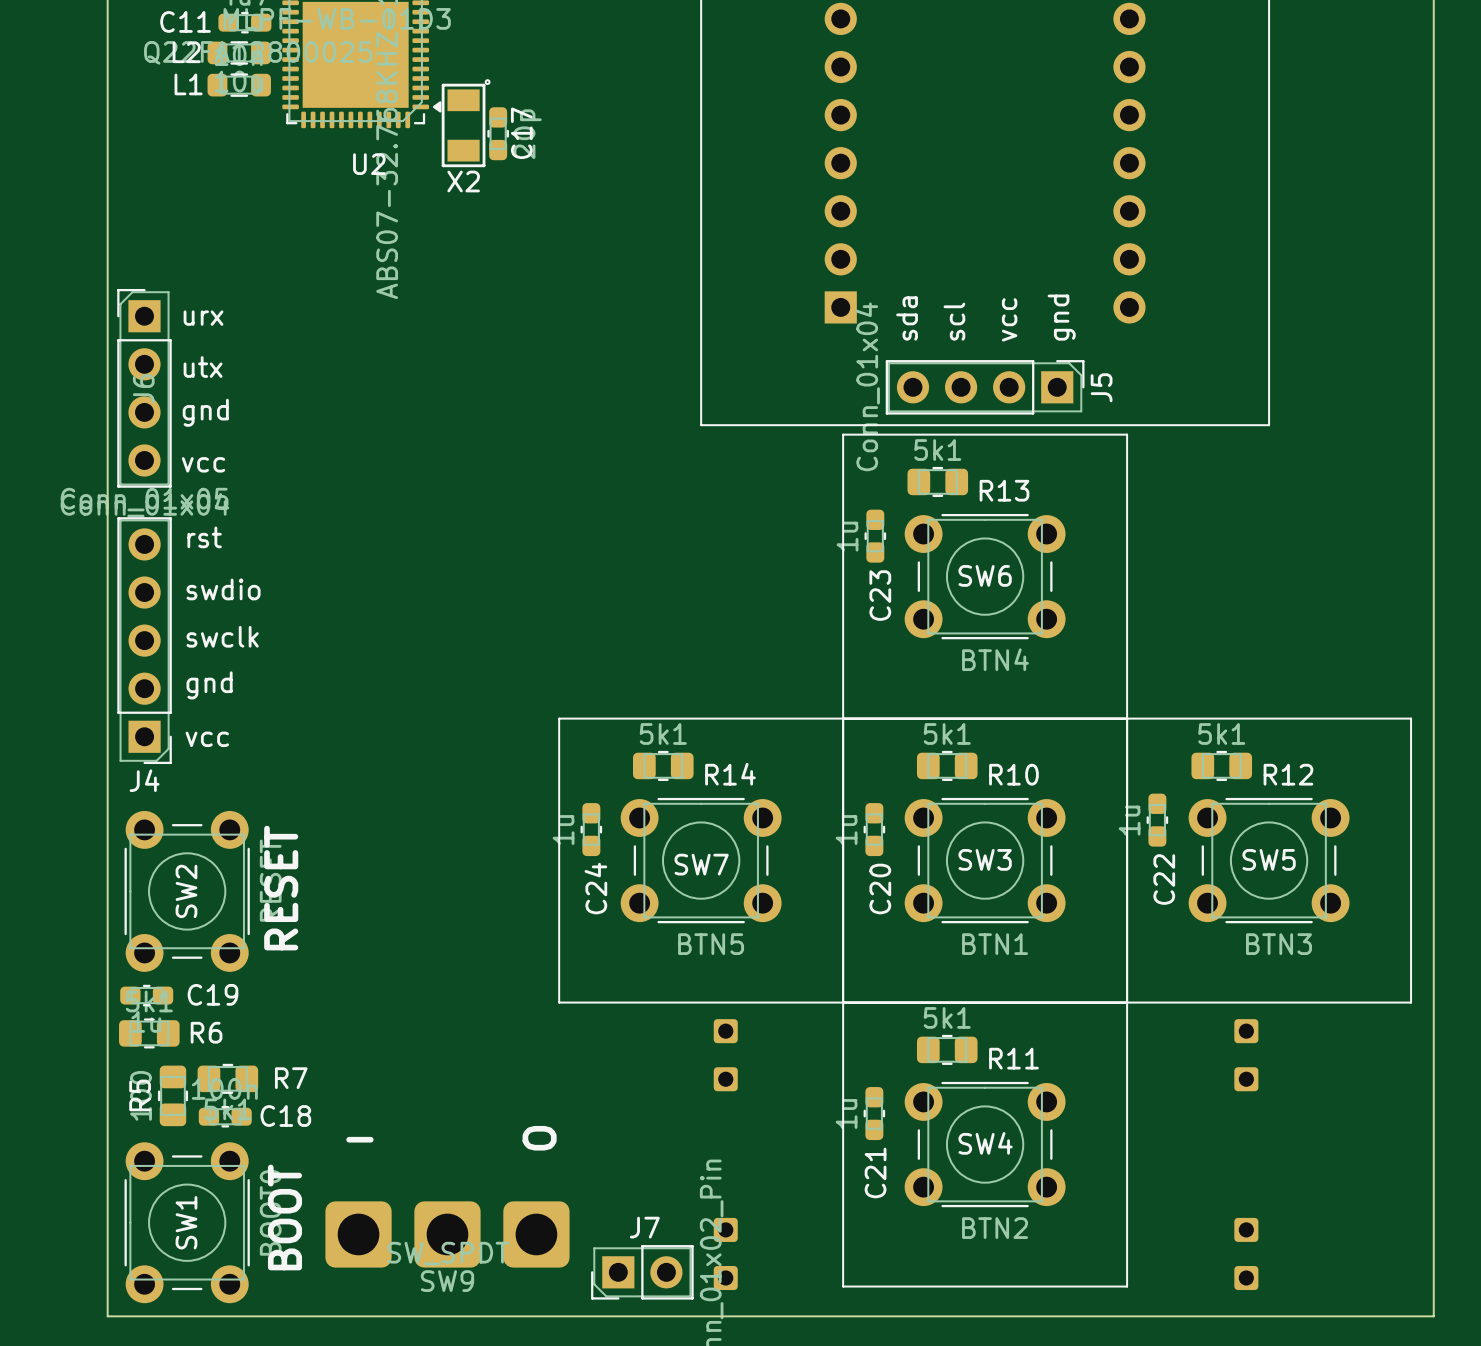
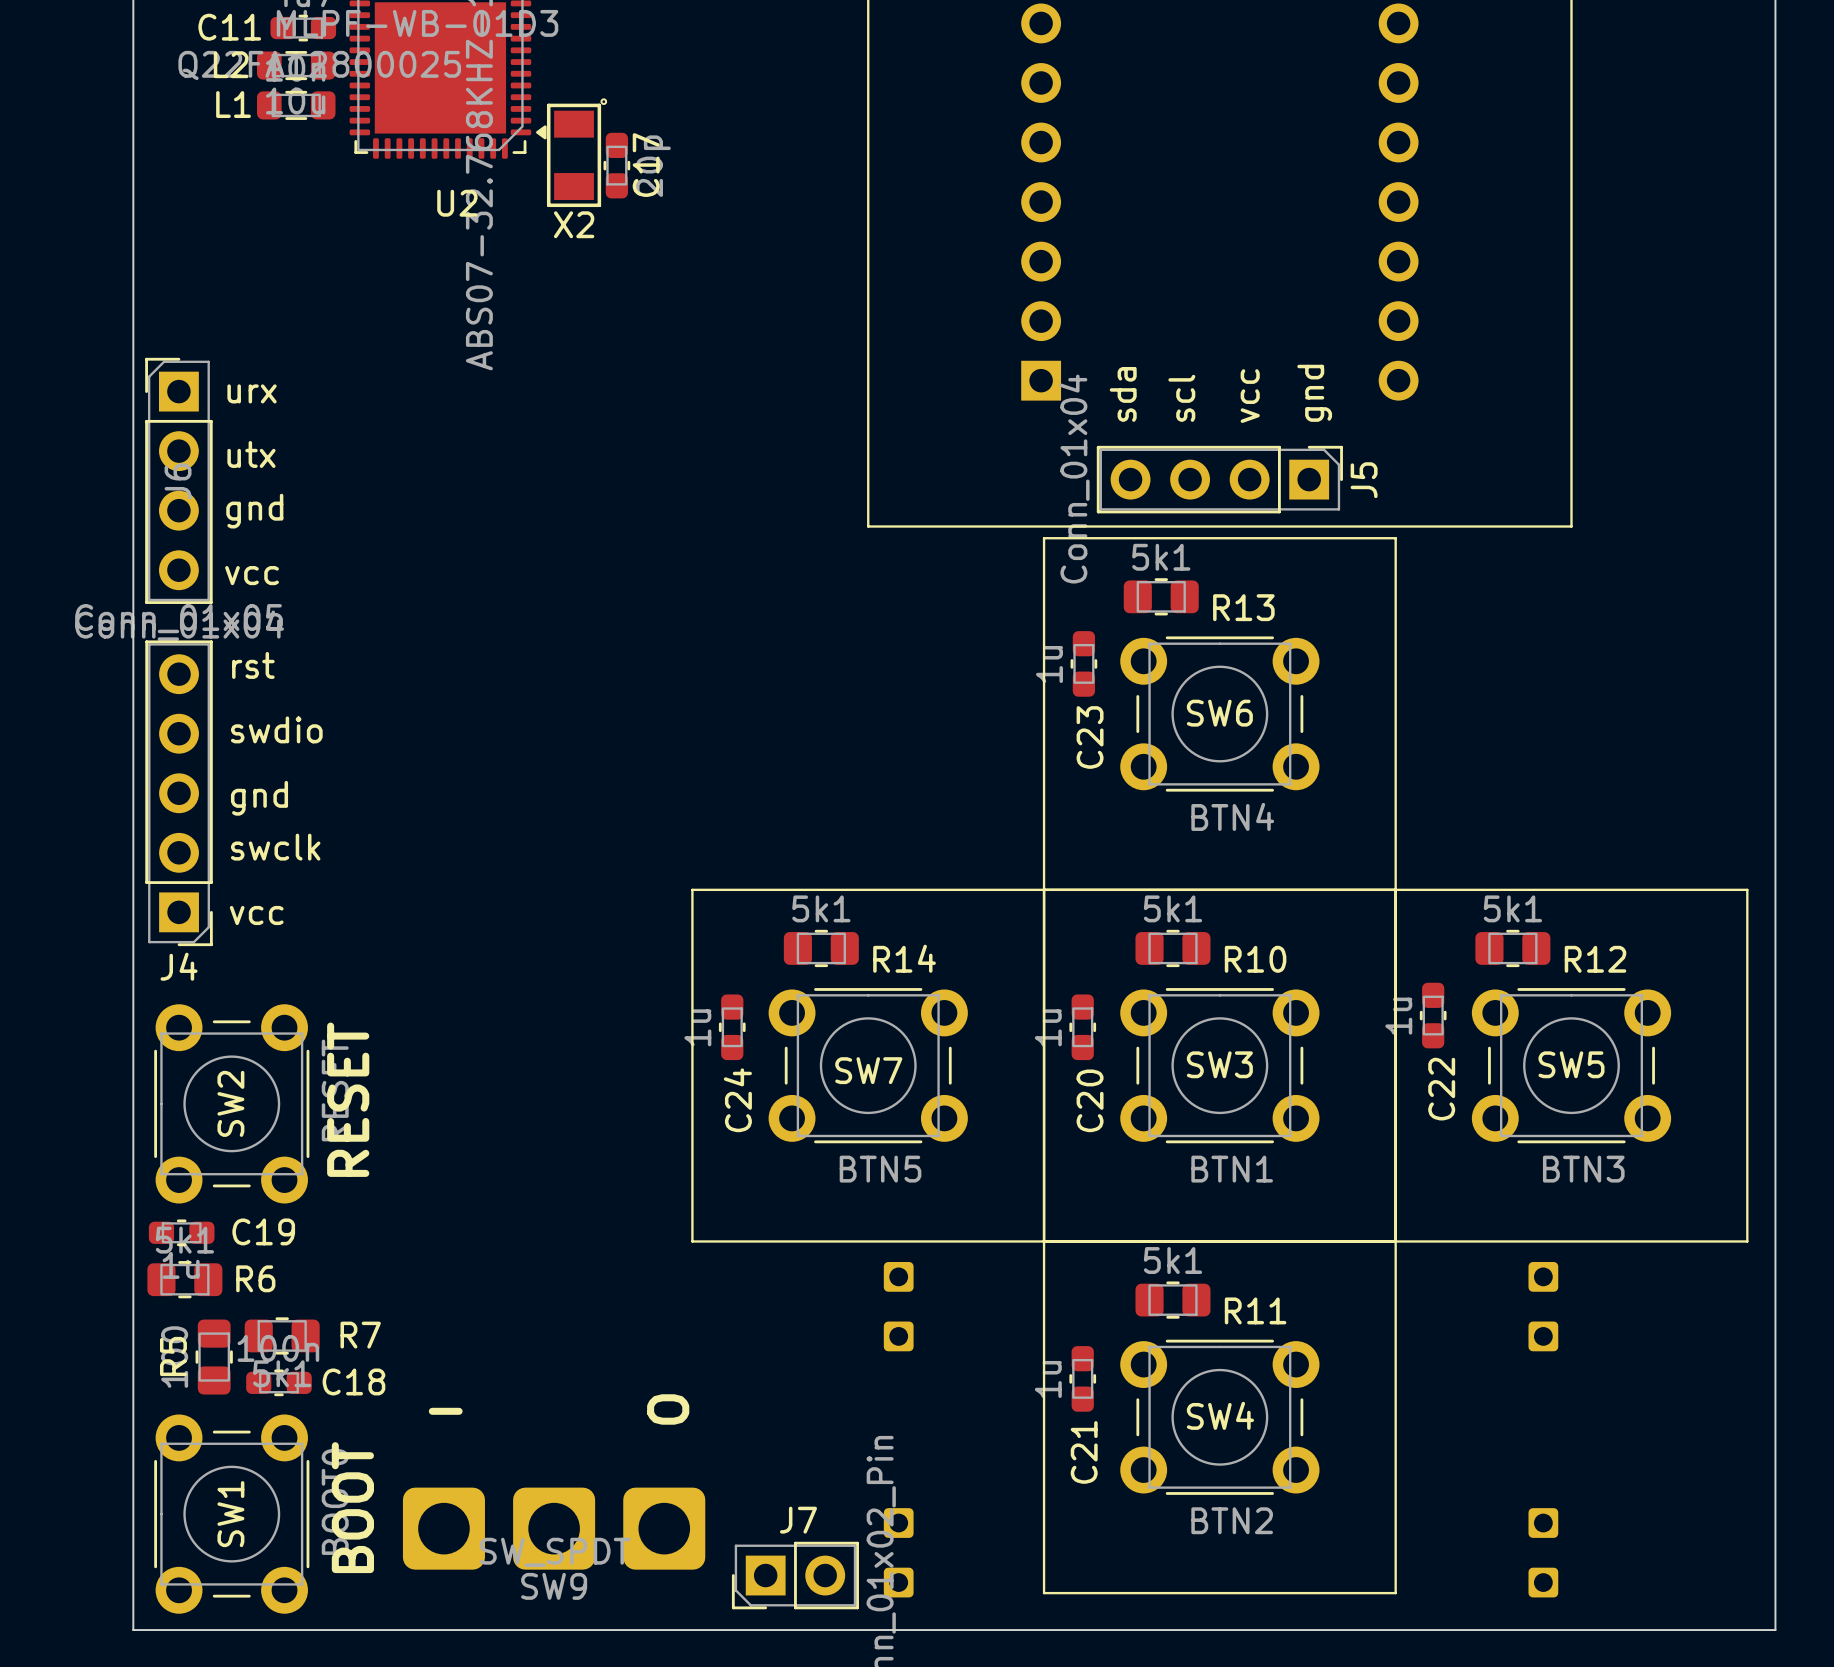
text: swclk (222, 636) -> gnd (259, 798)
text: gnd (209, 685) -> swclk (275, 847)

